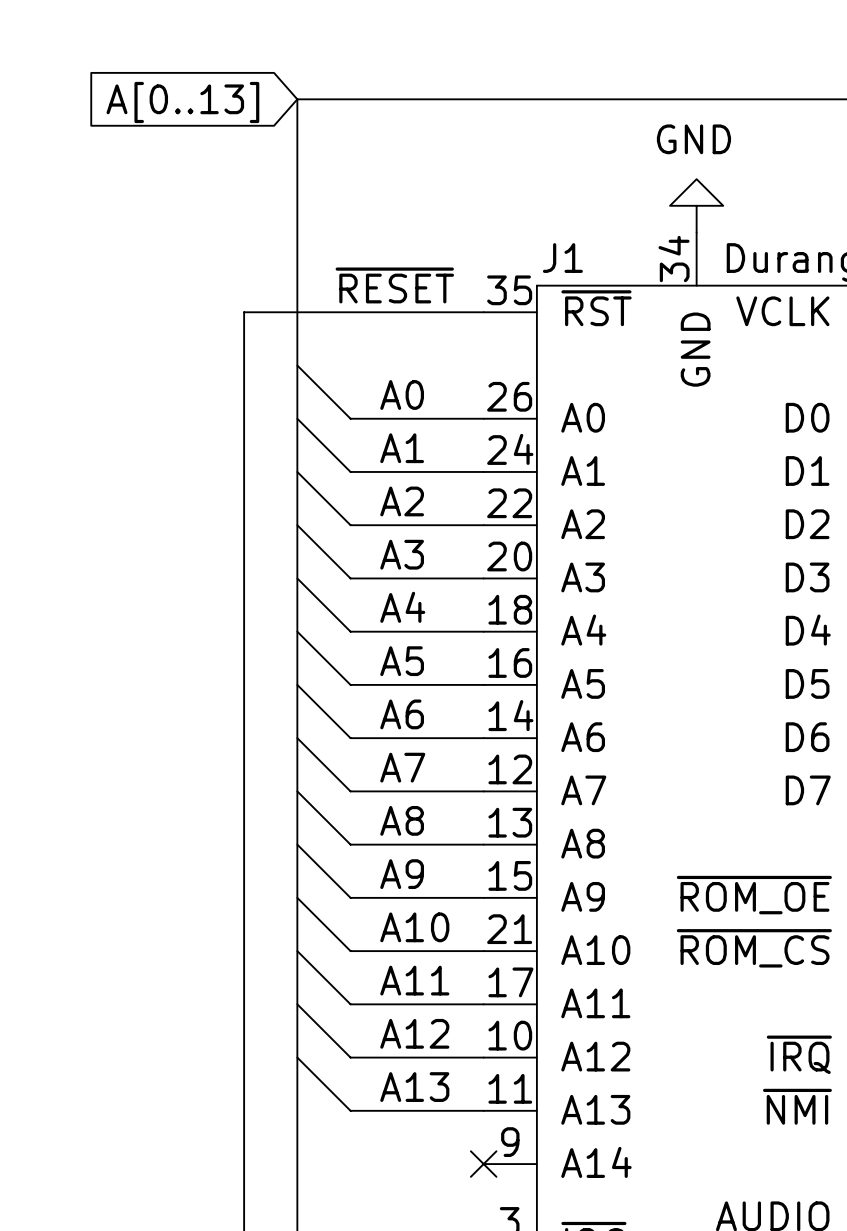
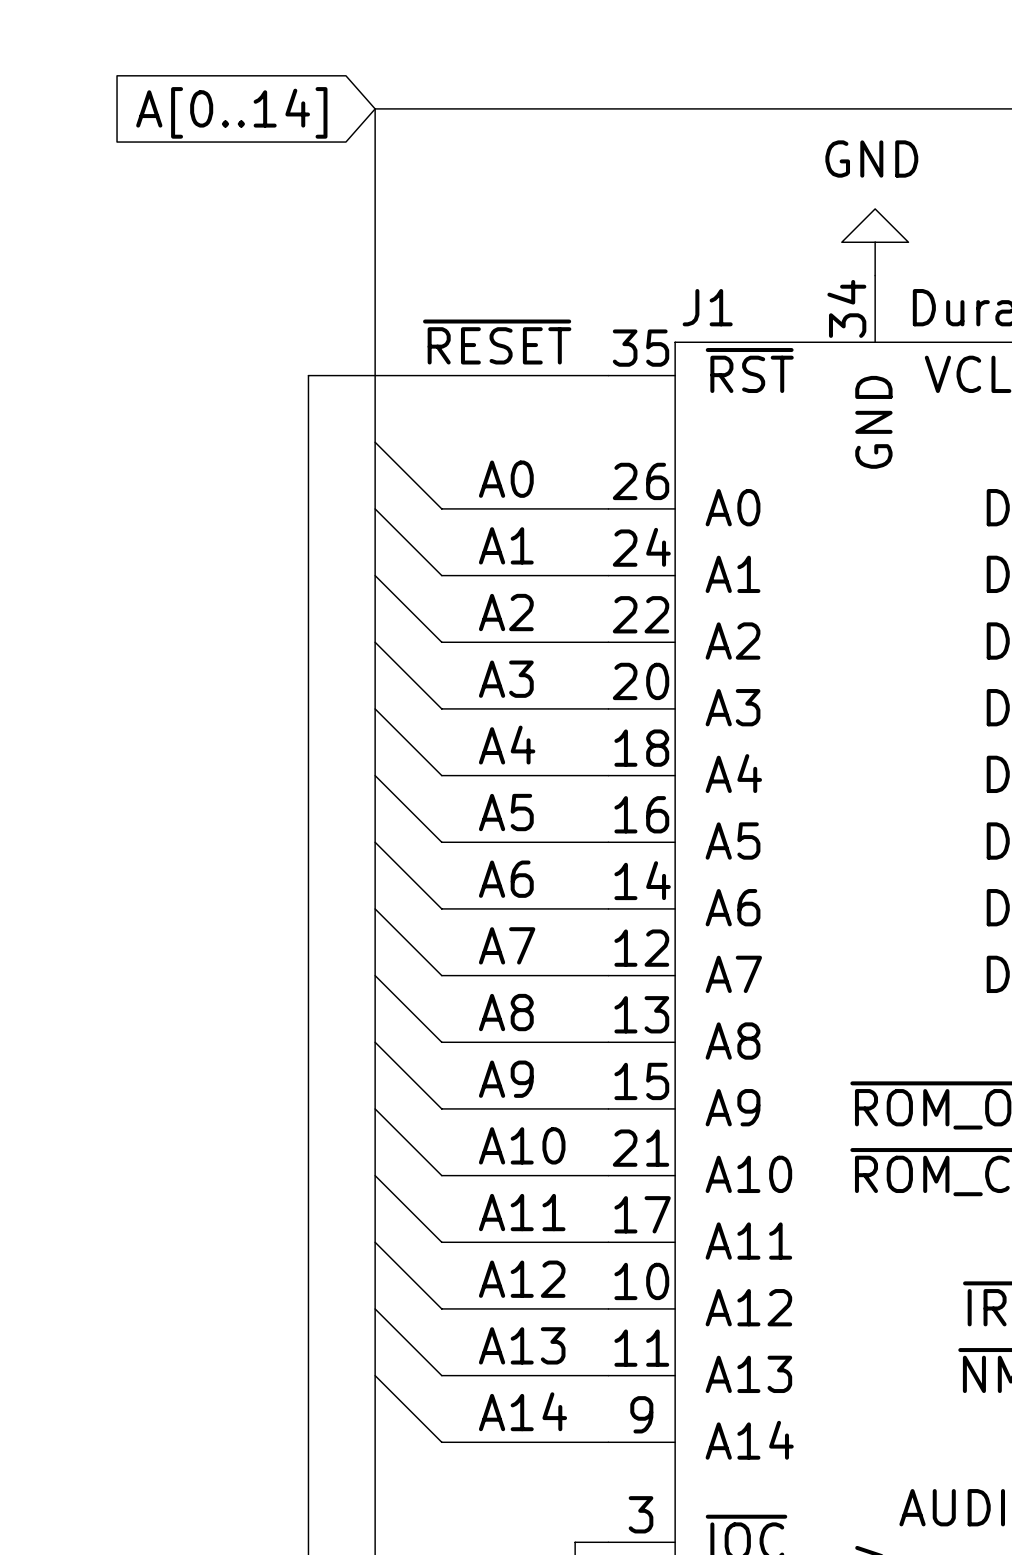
global label: A[0..13] (182, 102) -> A[0..14] (231, 112)
wire: none -> (375, 1375) (441, 1442) (608, 1442)
label: none -> A14 (523, 1411)
no-connect mark: (483, 1164) -> none

